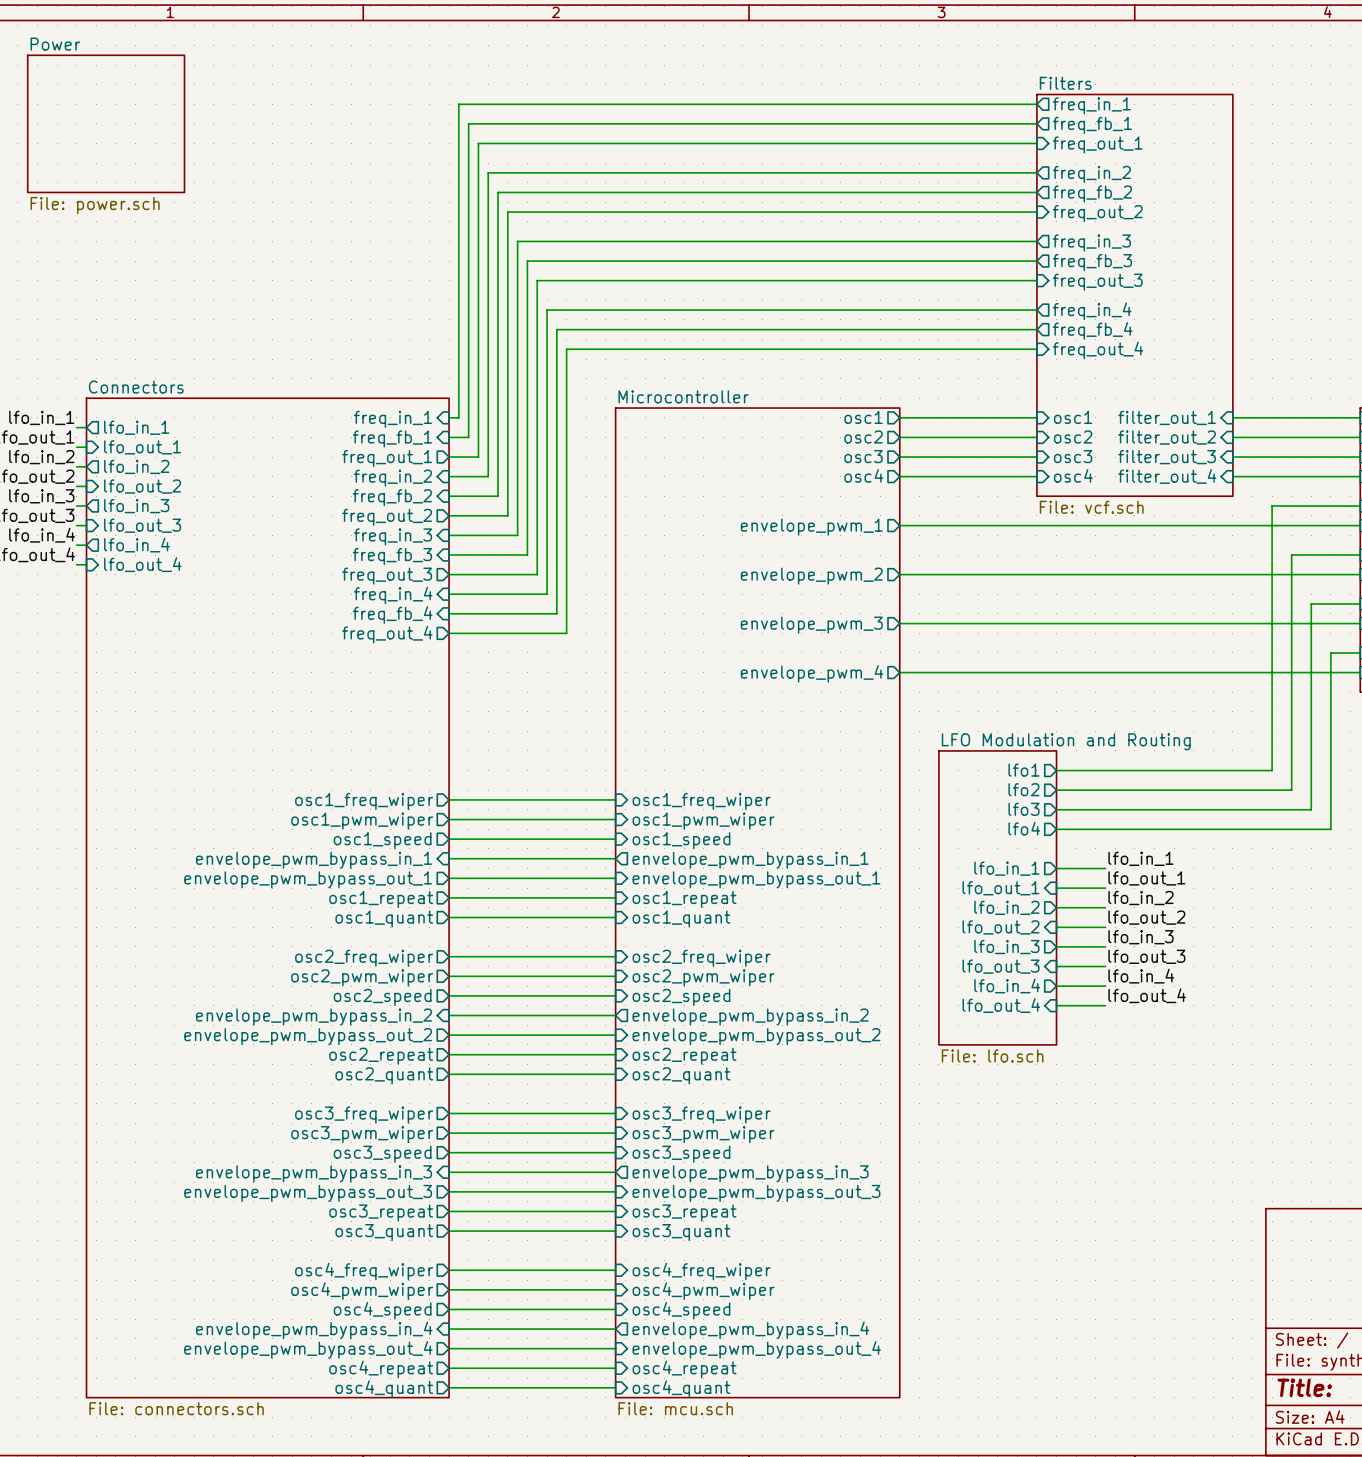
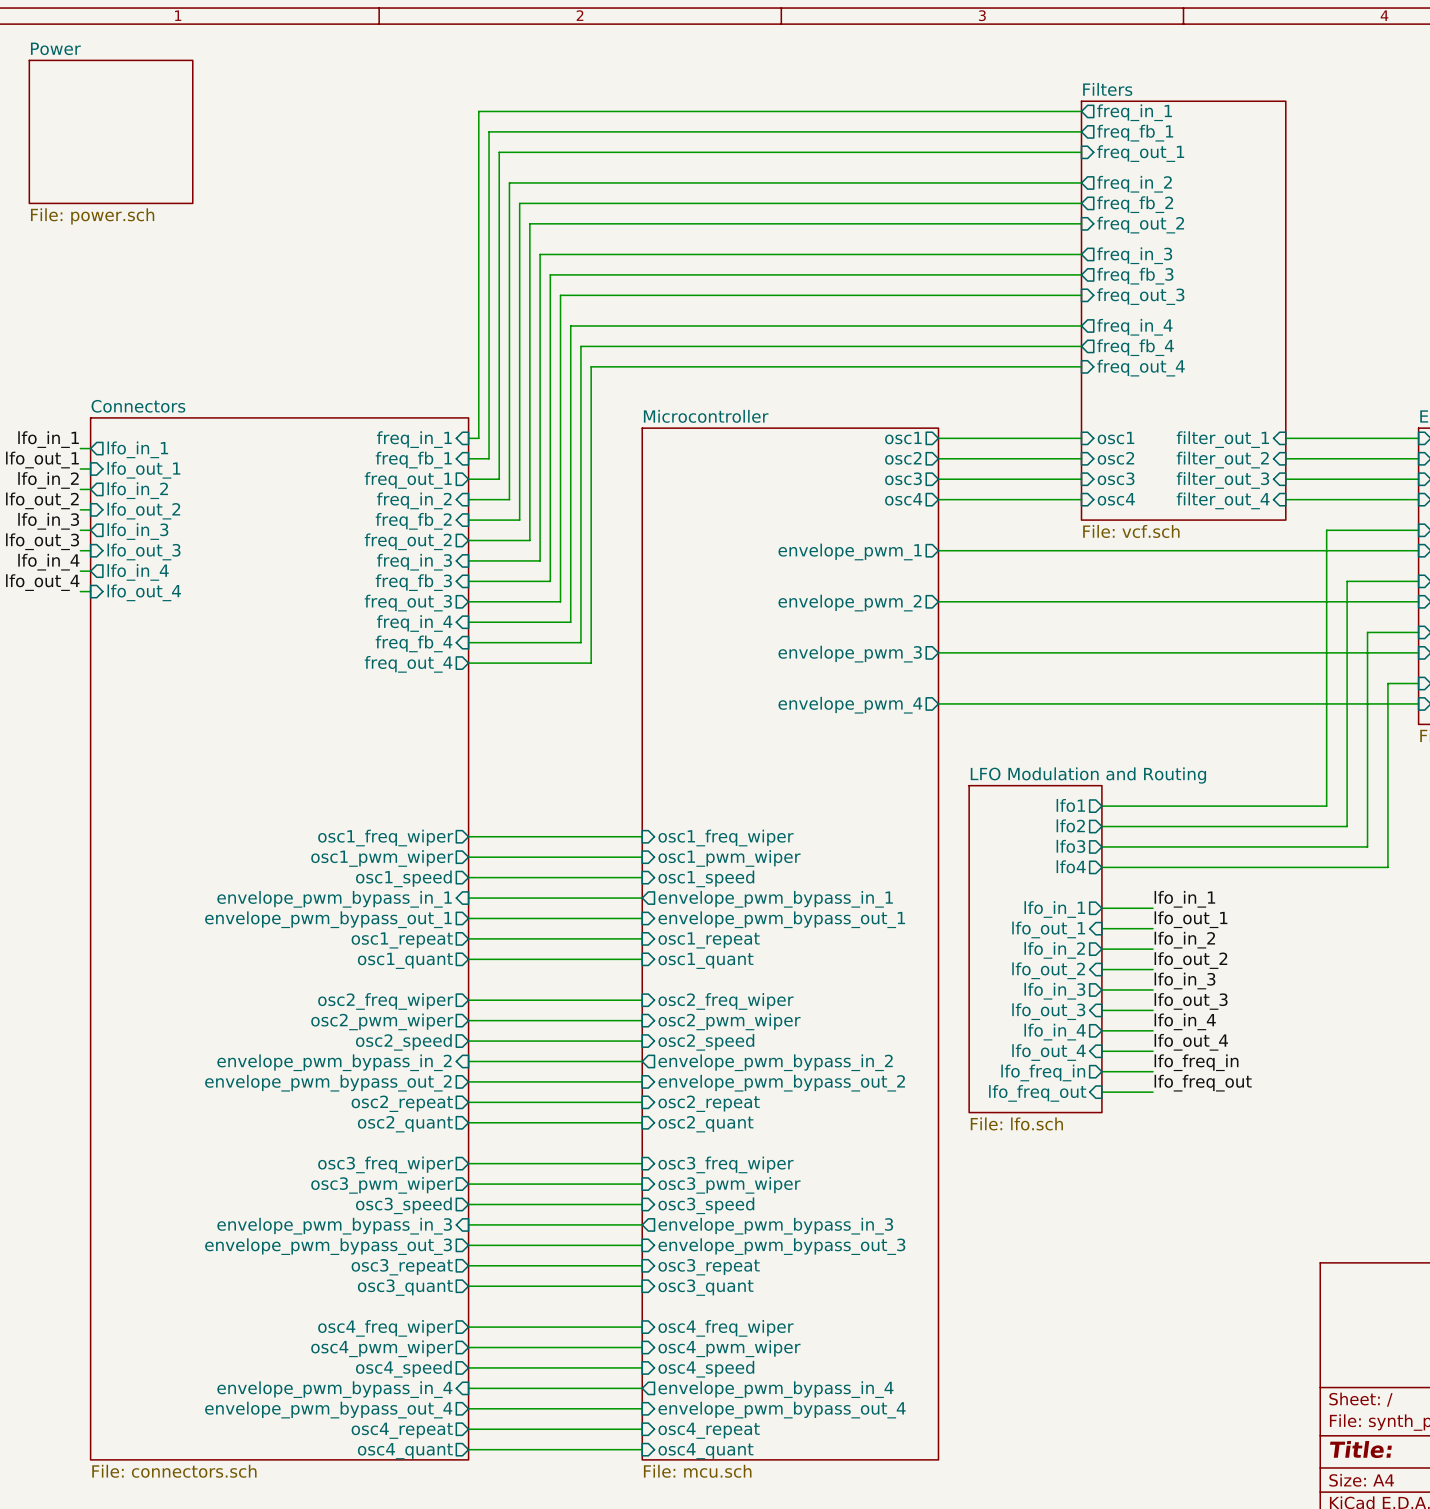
sheet LFO Modulation and Routing: File: lfo.sch (997, 897) -> none
sheet LFO Modulation and Routing: none -> File: lfo.sch (1035, 949)
label: none -> lfo_freq_in (1196, 1062)
wire: none -> (1101, 1071) (1153, 1071)
sheet pin: none -> lfo_freq_in (1043, 1072)
label: none -> lfo_freq_out (1203, 1083)
wire: none -> (1101, 1092) (1153, 1092)
sheet pin: none -> lfo_freq_out (1037, 1093)

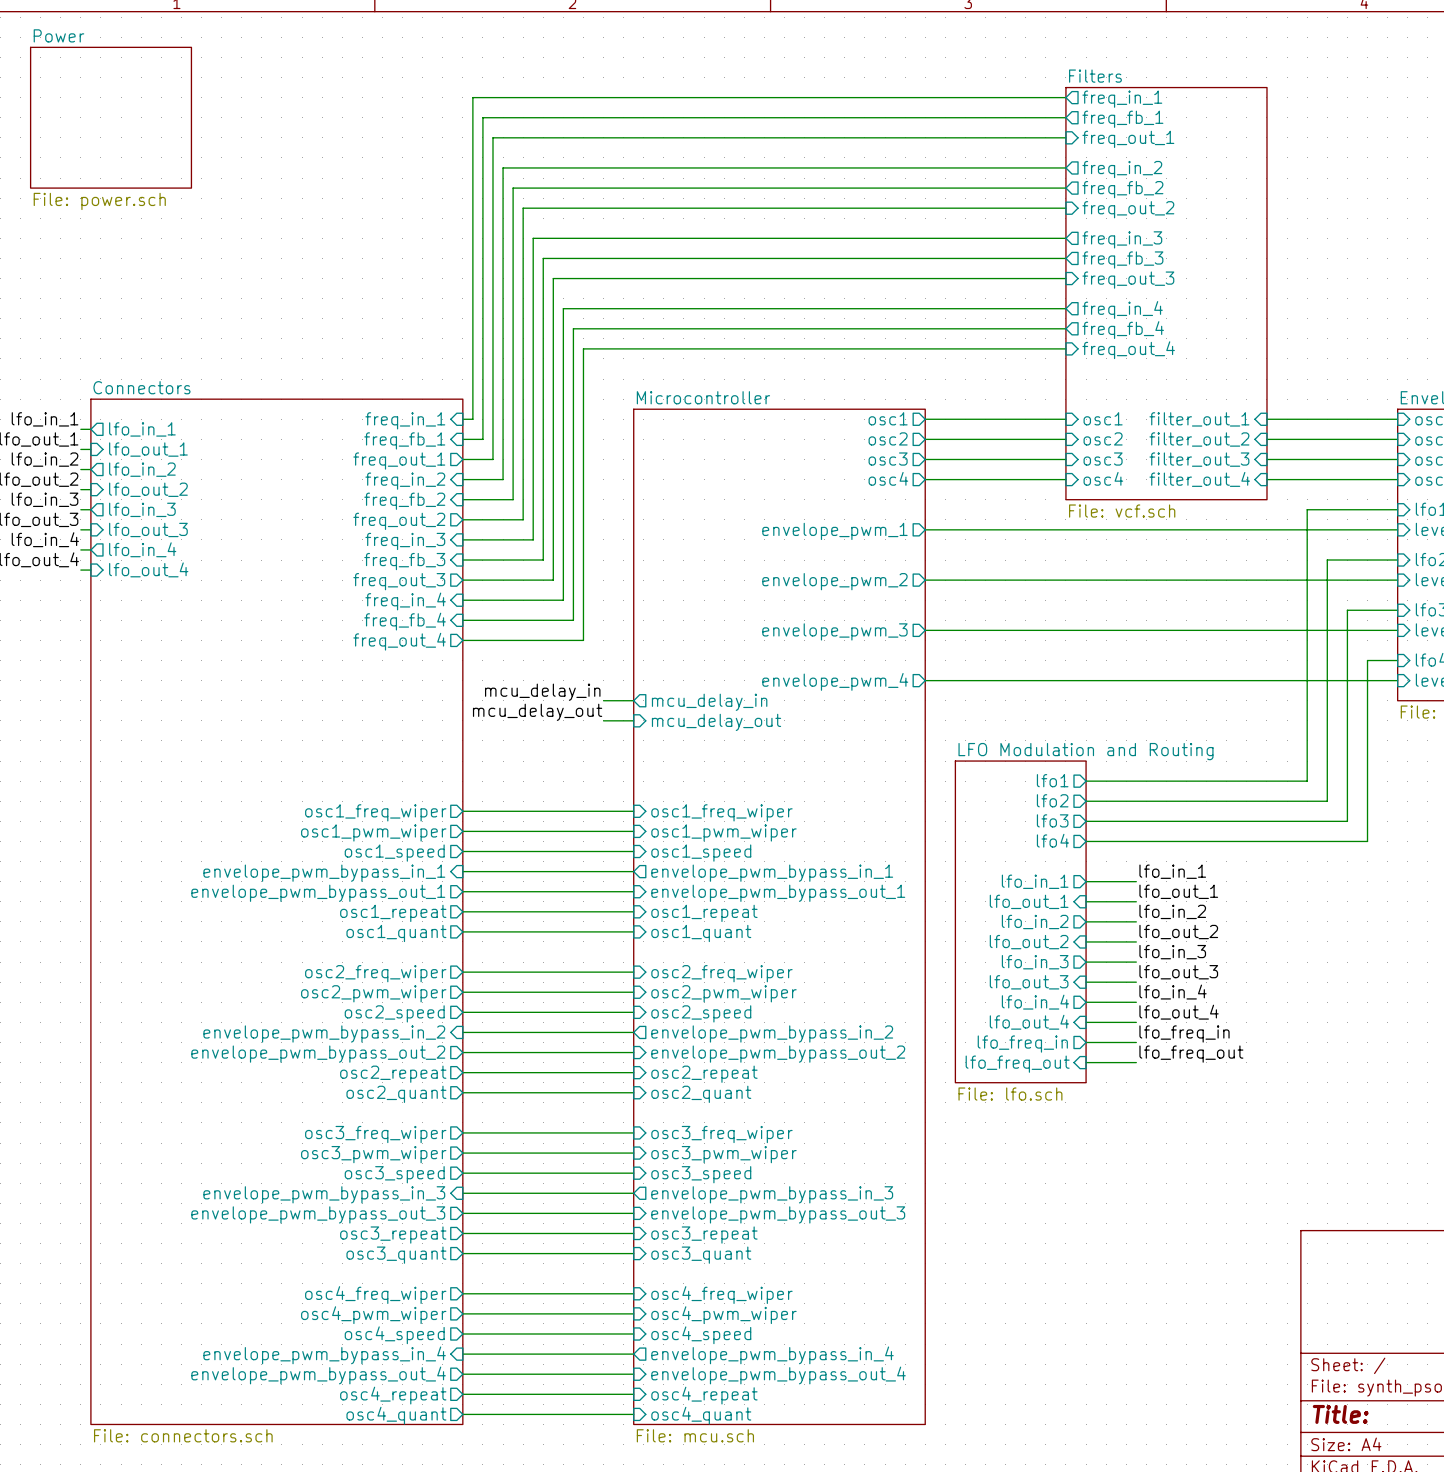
label: none -> mcu_delay_in (542, 692)
wire: none -> (603, 700) (633, 700)
sheet pin: none -> mcu_delay_in (709, 702)
label: none -> mcu_delay_out (537, 712)
wire: none -> (603, 720) (633, 720)
sheet pin: none -> mcu_delay_out (716, 722)

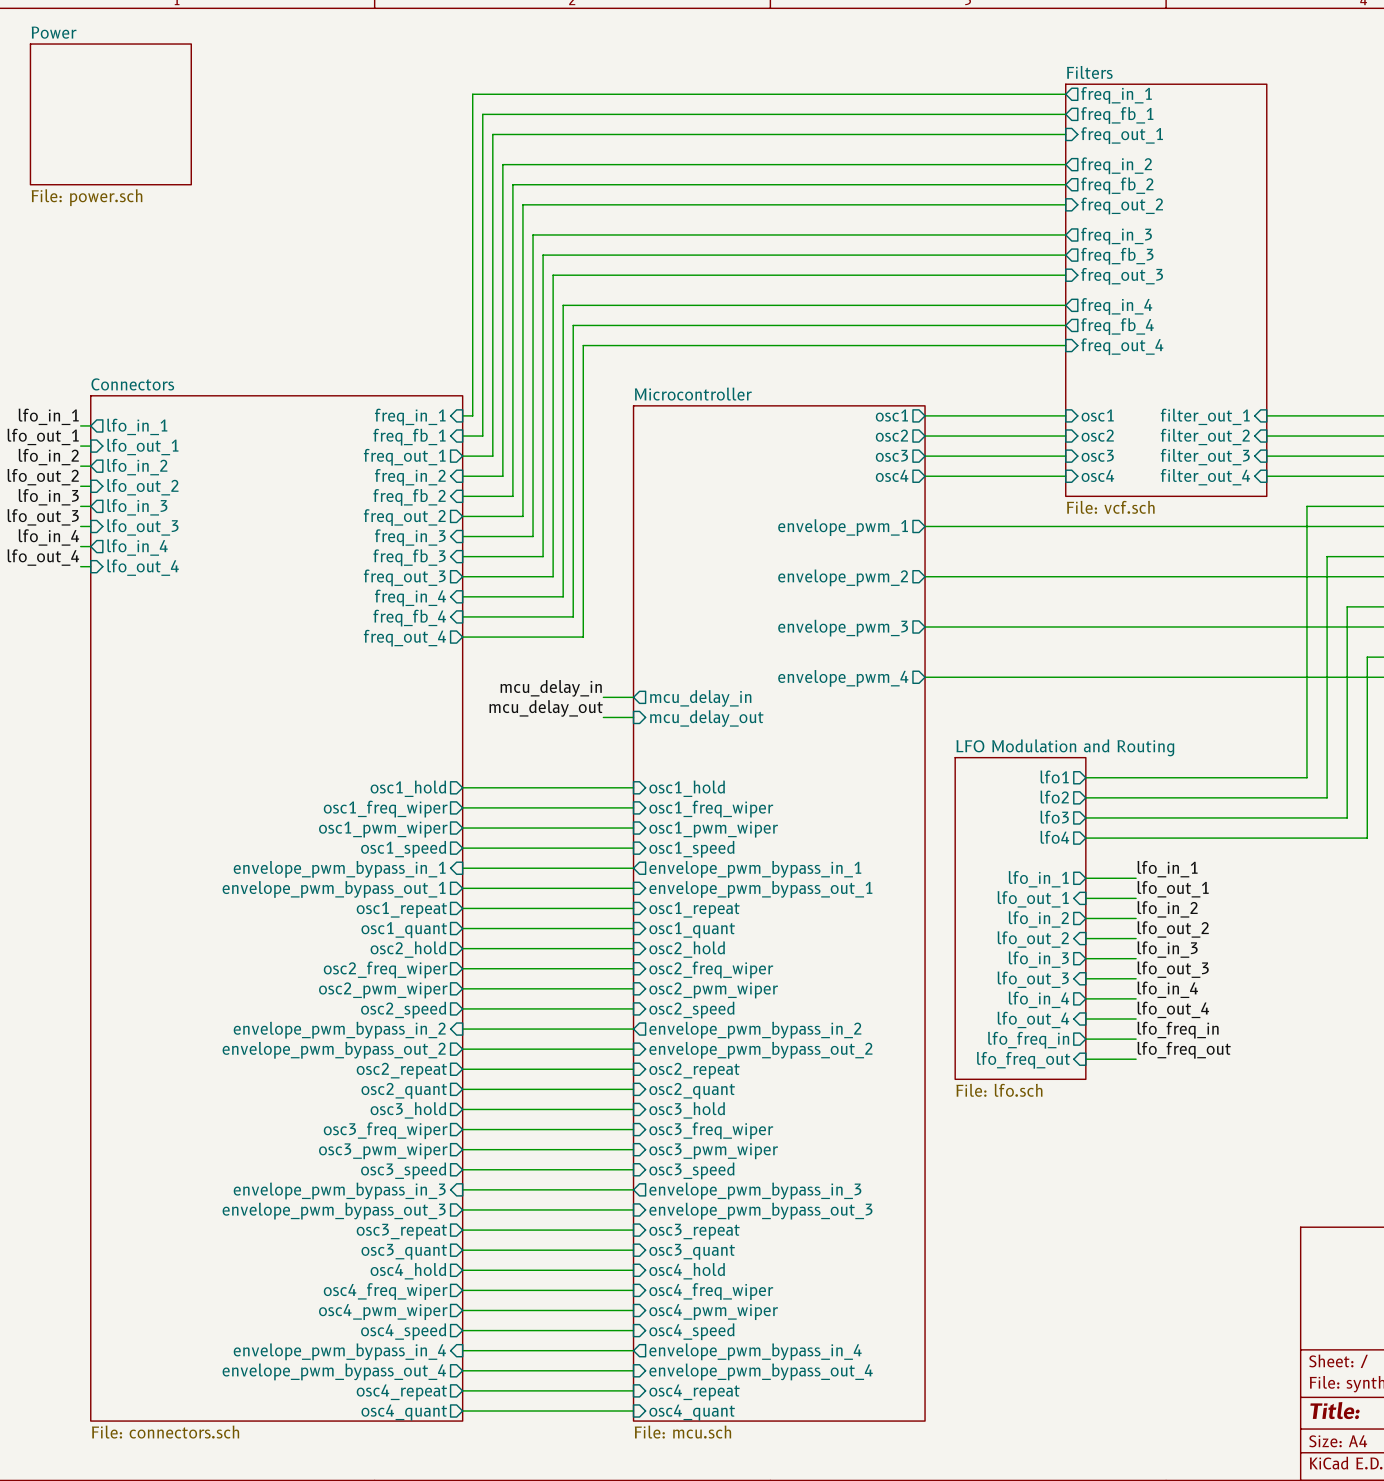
sheet pin: none -> osc1_hold (408, 788)
wire: none -> (462, 787) (633, 787)
sheet pin: none -> osc1_hold (687, 788)
sheet pin: none -> osc2_hold (408, 949)
wire: none -> (462, 948) (633, 948)
sheet pin: none -> osc2_hold (687, 949)
sheet pin: none -> osc3_hold (408, 1110)
wire: none -> (462, 1109) (633, 1109)
sheet pin: none -> osc3_hold (687, 1110)
sheet pin: none -> osc4_hold (408, 1271)
wire: none -> (462, 1270) (633, 1270)
sheet pin: none -> osc4_hold (687, 1271)

